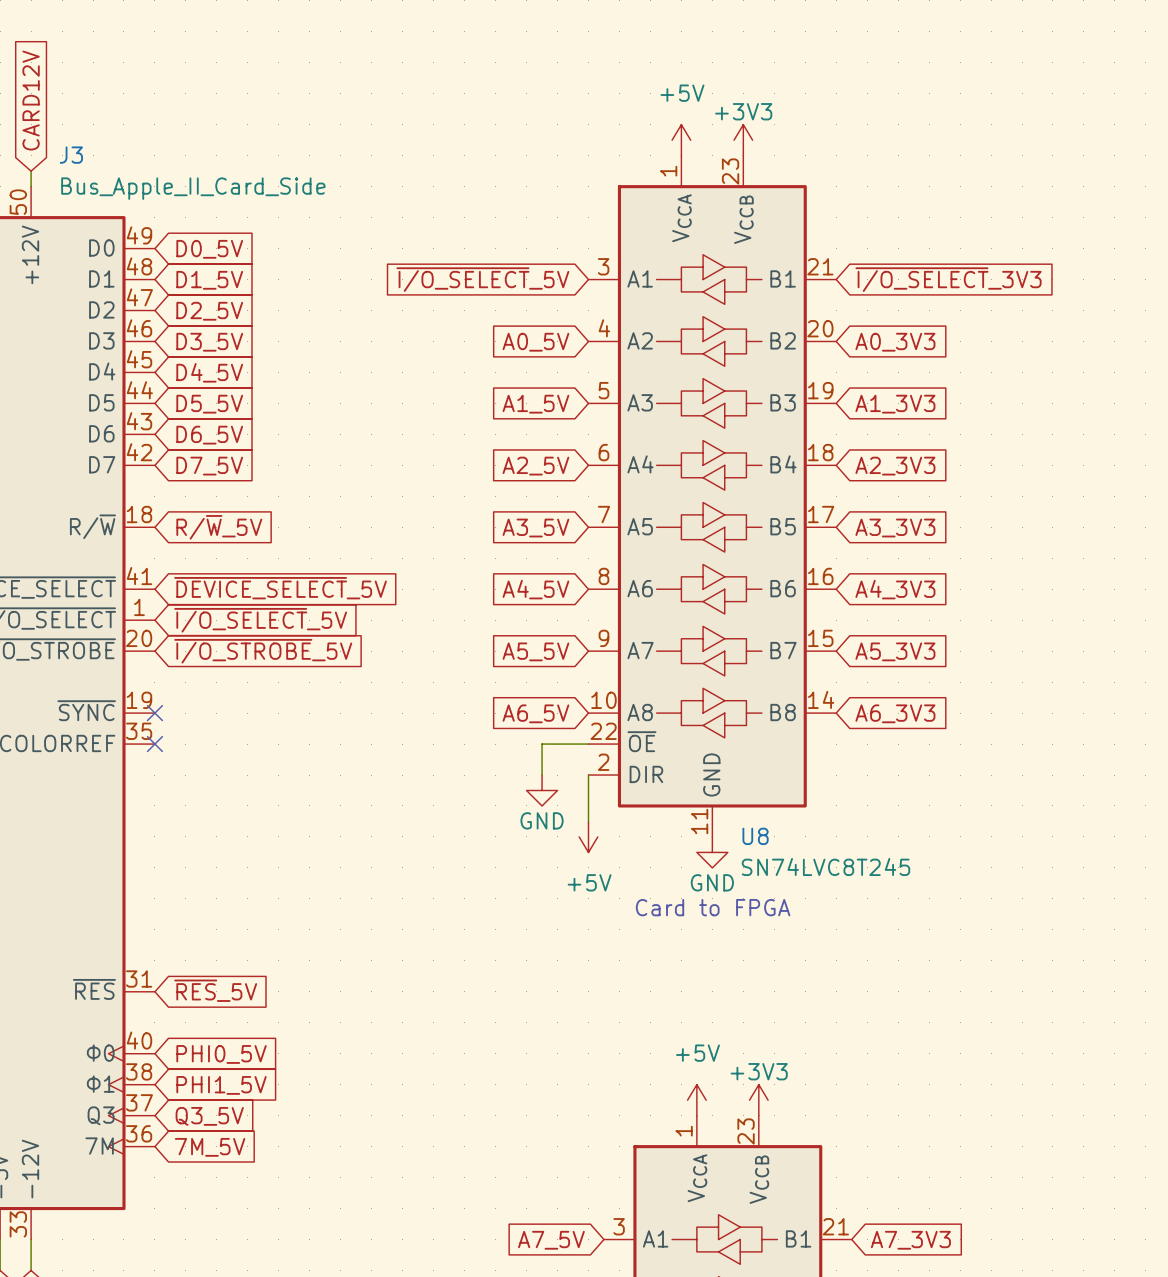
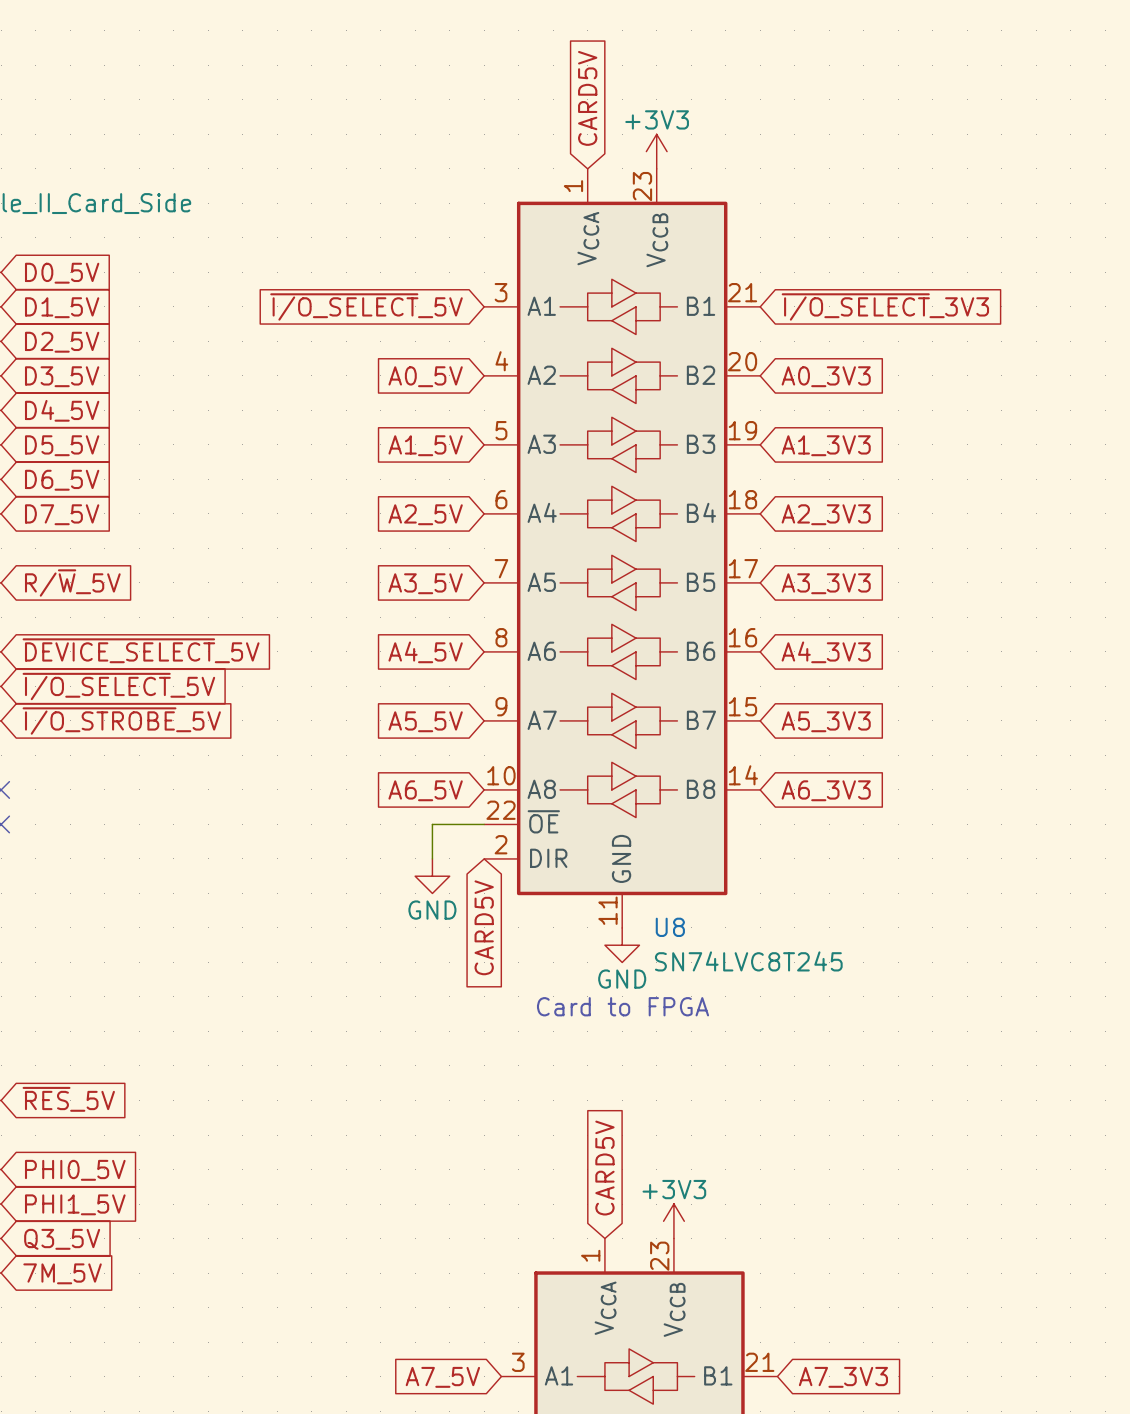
global label: none -> CARD5V (587, 98)
power symbol: +5V (681, 140) -> none
wire: (588, 775) (588, 821) -> none
power symbol: +5V (588, 836) -> none
global label: none -> CARD5V (484, 927)
global label: none -> CARD5V (604, 1168)
power symbol: +5V (696, 1100) -> none

